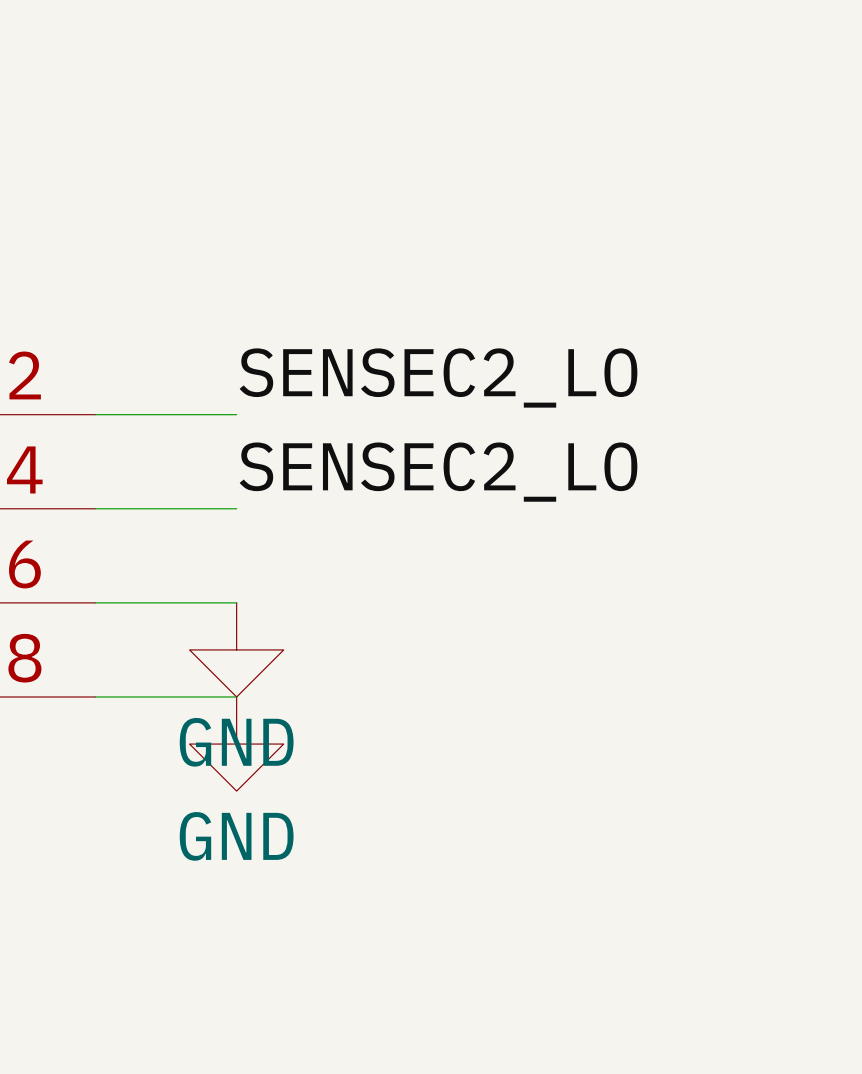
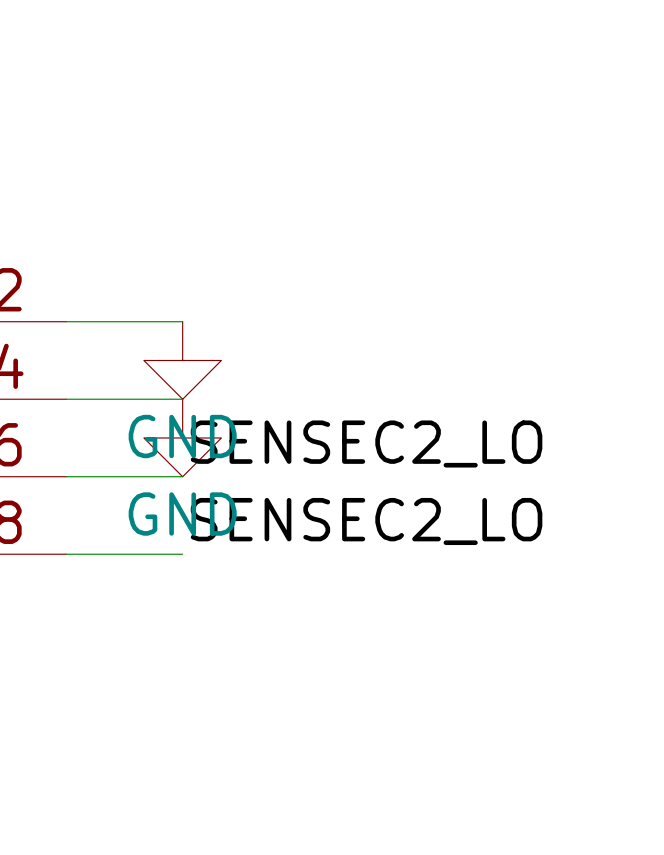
label: SENSEC2_LO (438, 377) -> none
power symbol: none -> GND (182, 360)
label position: SENSEC2_LO (438, 472) -> SENSEC2_LO (366, 443)
power symbol: none -> GND (182, 437)
power symbol: GND (236, 649) -> none
label: none -> SENSEC2_LO (366, 521)
power symbol: GND (236, 744) -> none

